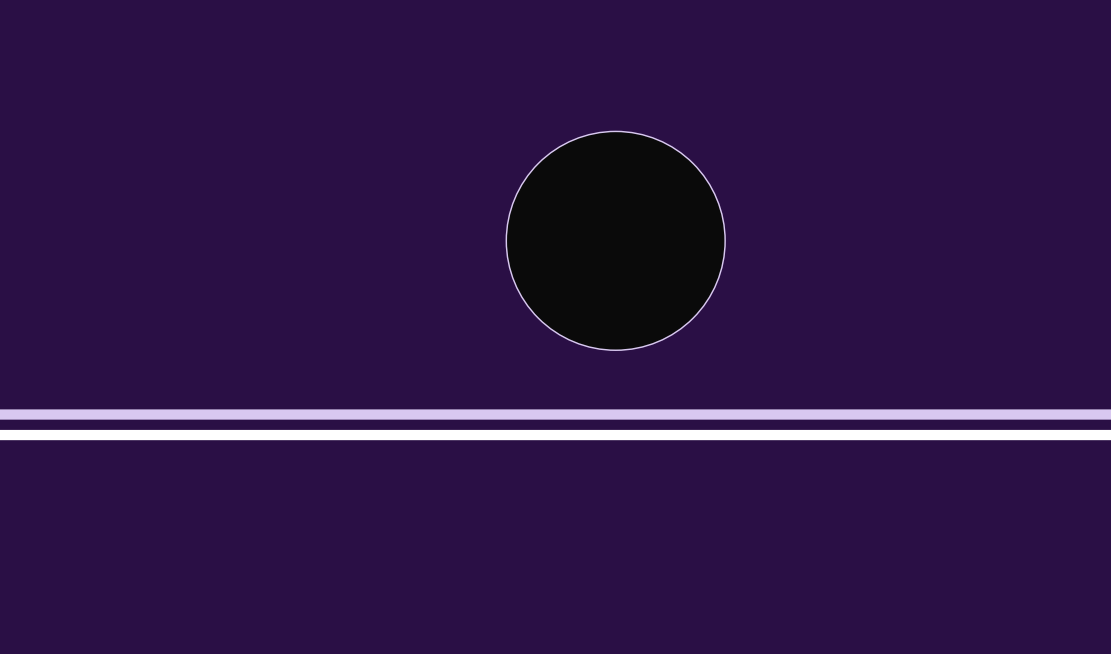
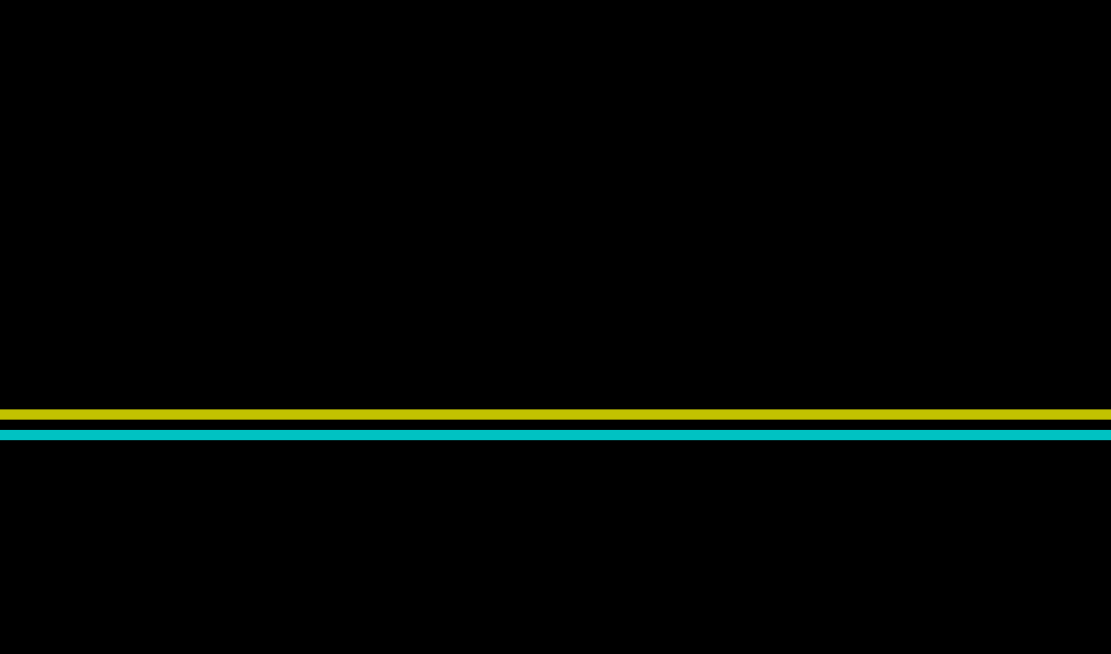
part: (615, 240) -> none

